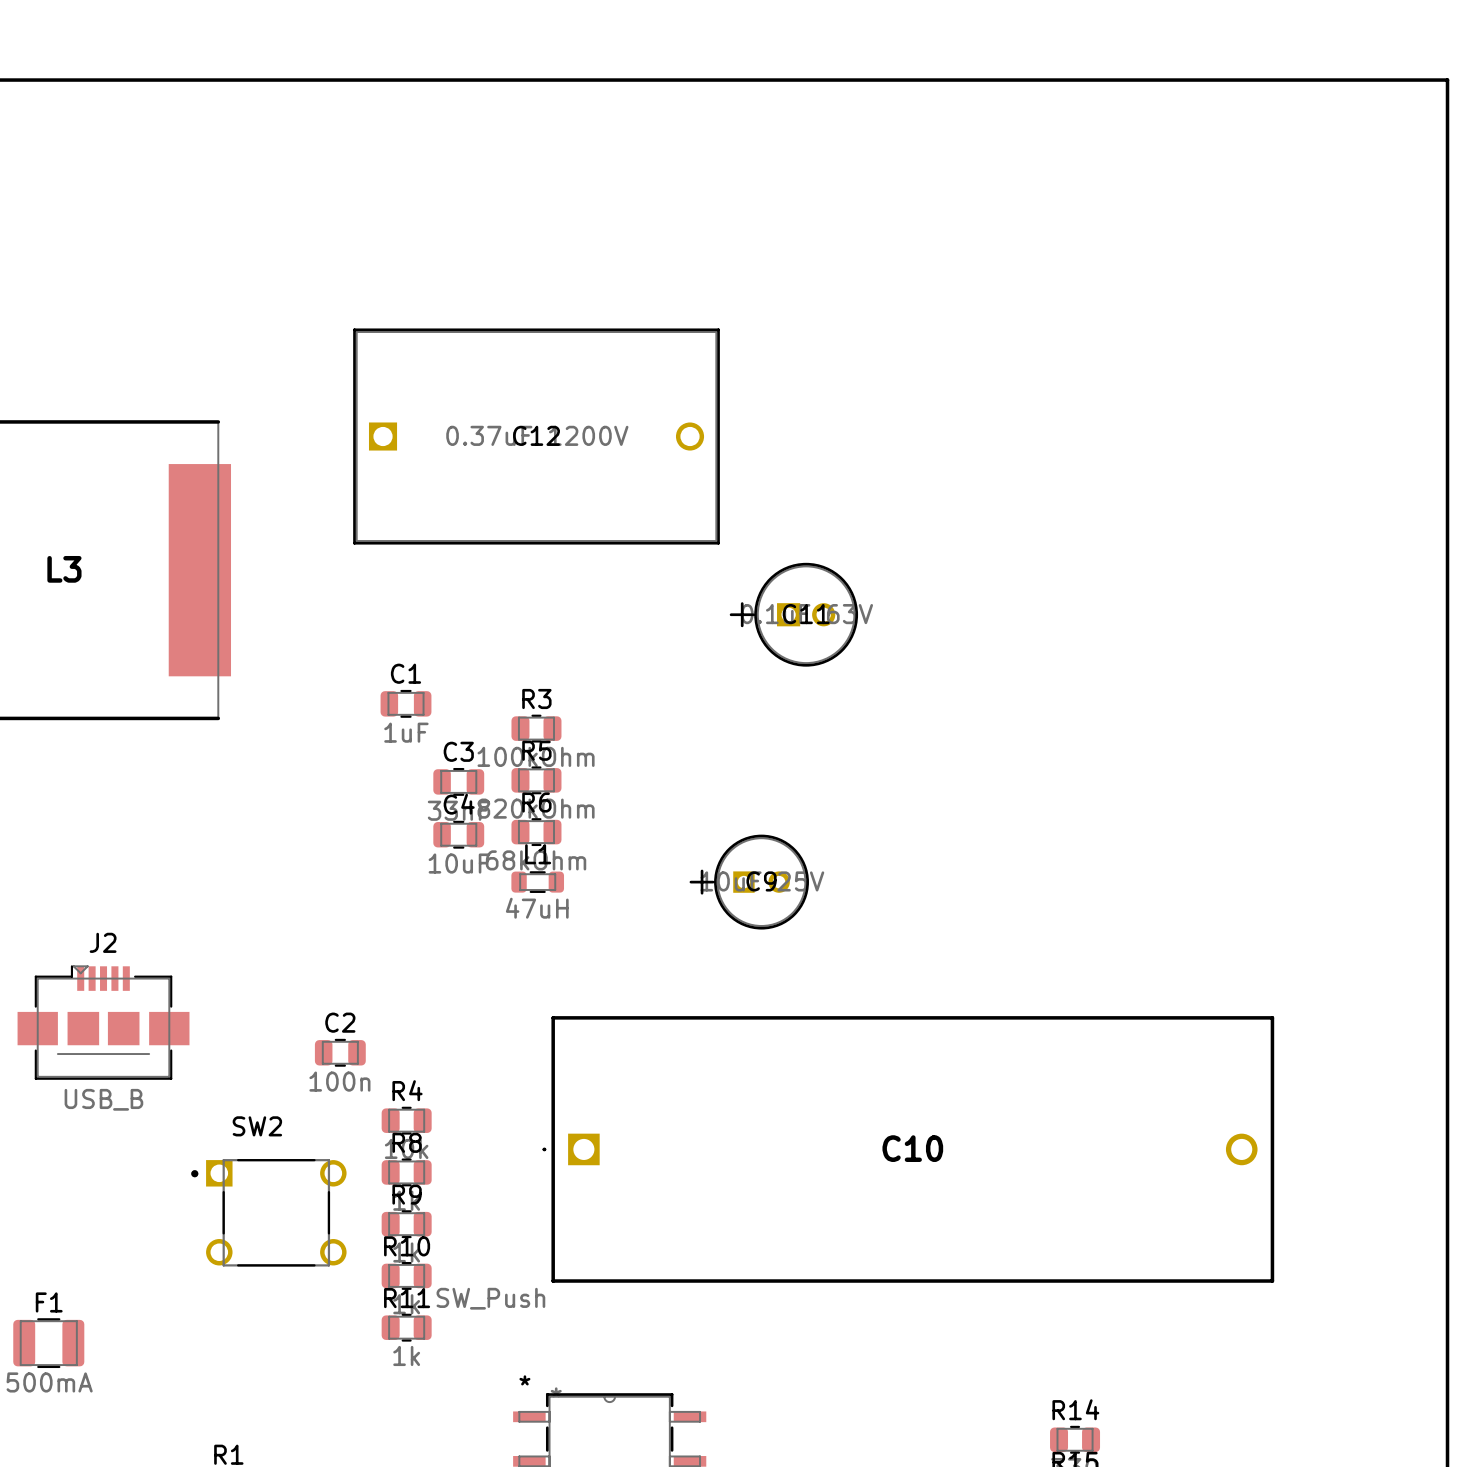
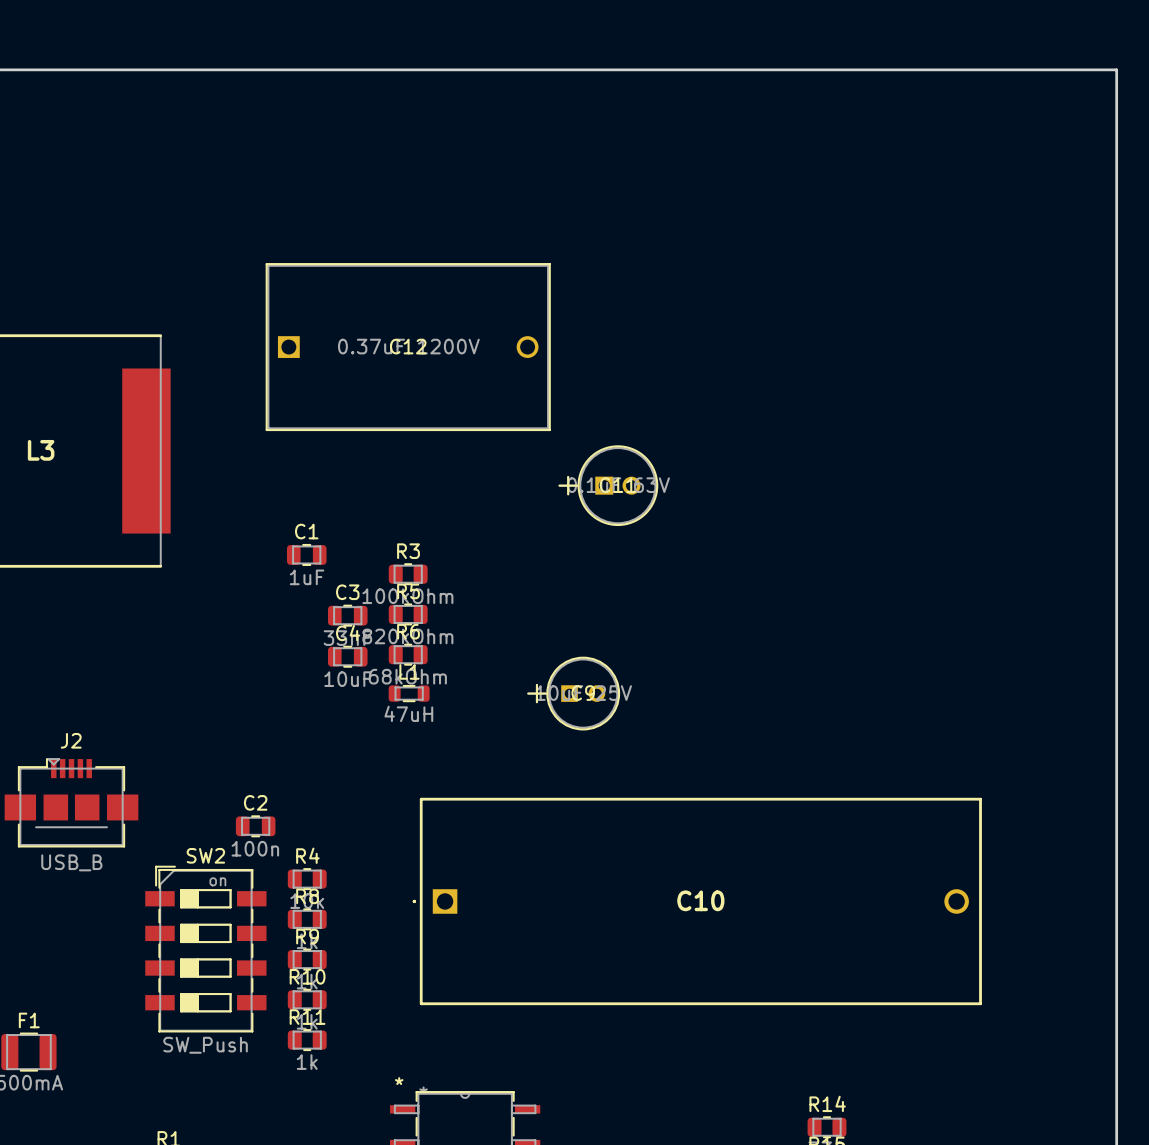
SW2 name position: SW2 (257, 1126) -> SW2 (205, 855)
SW2 footprint: [191, 1159, 347, 1267] -> [145, 865, 267, 1033]
SW2 value position: SW_Push (490, 1298) -> SW_Push (205, 1045)

